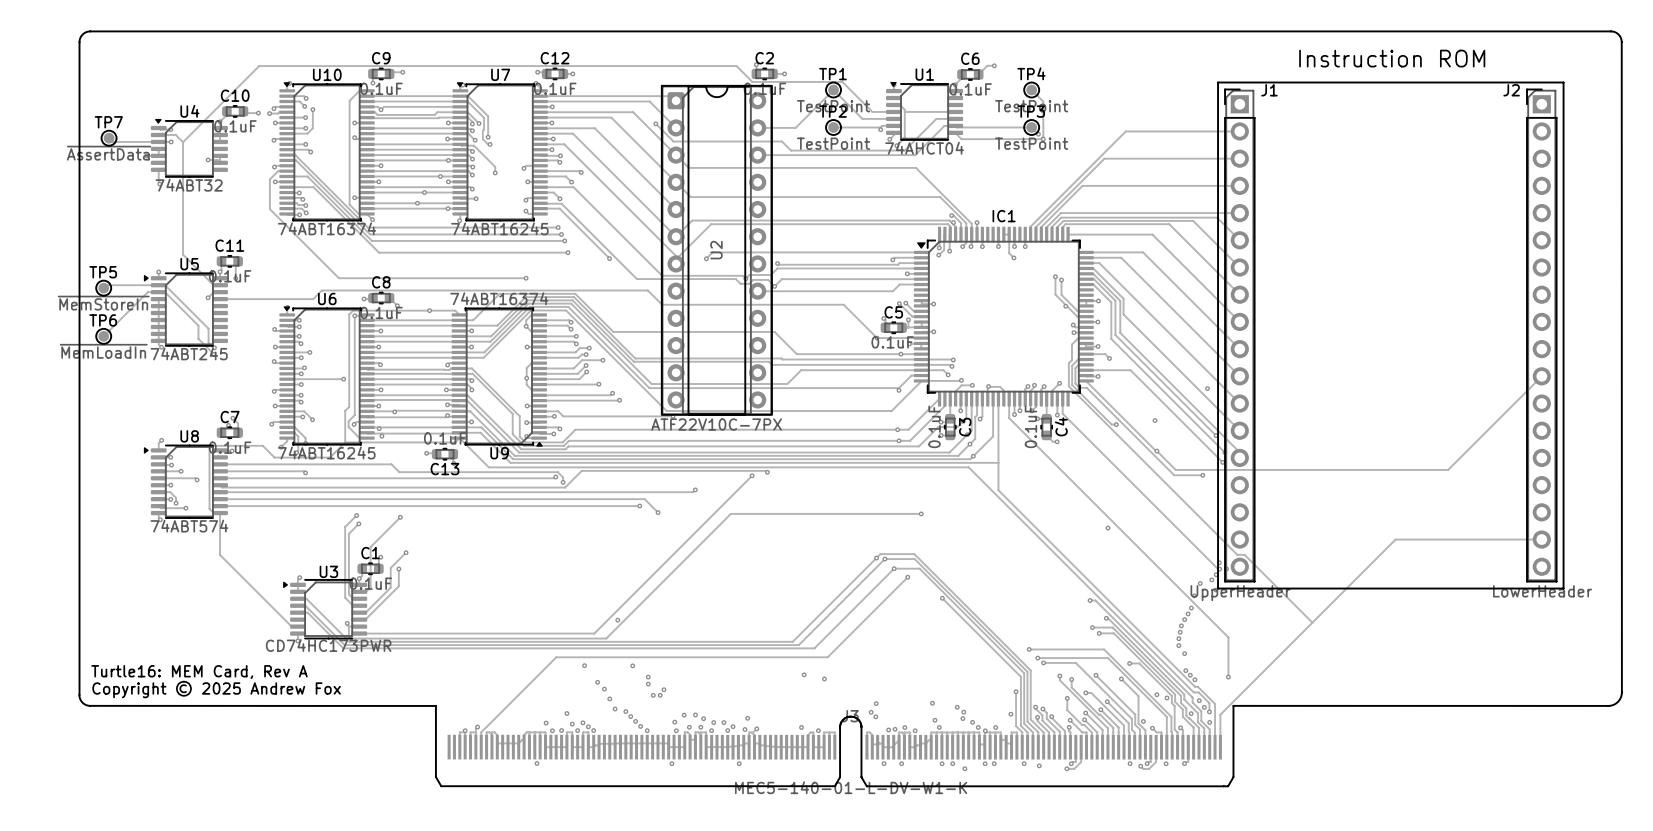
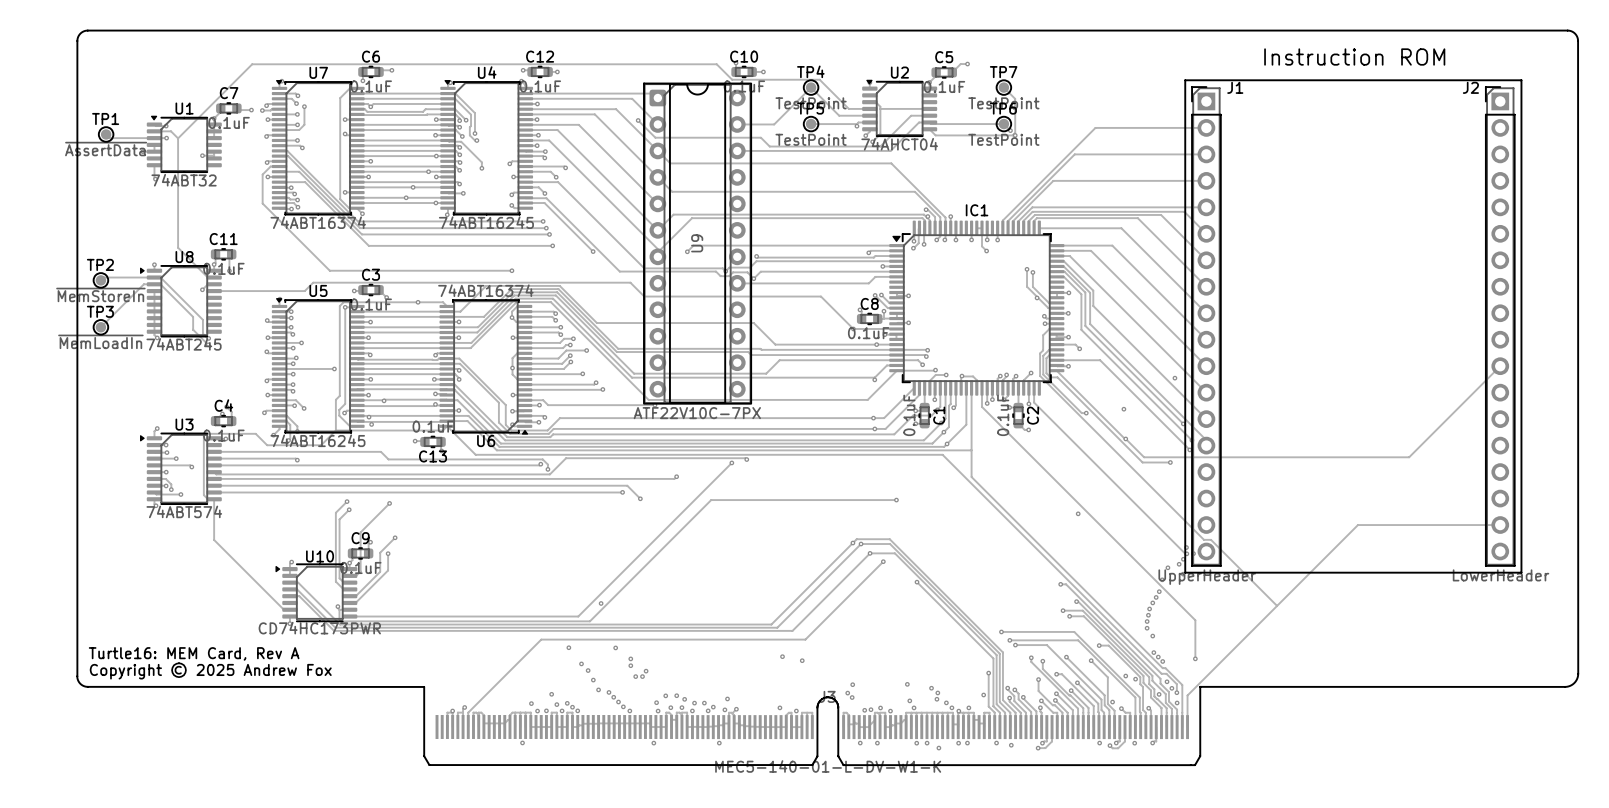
C9 name: C9 (381, 58) -> C6 (370, 56)
C2 name: C2 (764, 58) -> C10 (744, 56)
C6 name: C6 (970, 58) -> C5 (944, 57)
TP4 name: TP4 (1031, 73) -> TP7 (1003, 72)
U10 name: U10 (327, 74) -> U7 (318, 72)
U7 name: U7 (500, 74) -> U4 (487, 72)
TP1 name: TP1 (833, 74) -> TP4 (810, 71)
U1 name: U1 (924, 74) -> U2 (899, 72)
C10 name: C10 (235, 95) -> C7 (229, 93)
U4 name: U4 (189, 111) -> U1 (184, 108)
TP2 name: TP2 (833, 111) -> TP5 (810, 108)
TP3 name: TP3 (1031, 111) -> TP6 (1003, 108)
TP7 name: TP7 (108, 122) -> TP1 (105, 118)
U2 name: U2 (716, 250) -> U9 (697, 243)
U5 name: U5 (189, 264) -> U8 (184, 257)
TP5 name: TP5 (103, 272) -> TP2 (100, 264)
C8 name: C8 (381, 282) -> C3 (370, 274)
U6 name: U6 (327, 298) -> U5 (318, 290)
C5 name: C5 (893, 312) -> C8 (869, 303)
TP6 name: TP6 (103, 320) -> TP3 (100, 311)
C7 name: C7 (230, 417) -> C4 (223, 405)
C4 name: C4 (1061, 426) -> C2 (1033, 415)
C3 name: C3 (965, 427) -> C1 (939, 415)
U8 name: U8 (189, 436) -> U3 (184, 424)
U9 name: U9 (499, 453) -> U6 (486, 441)
C1 name: C1 (370, 553) -> C9 (360, 538)
U3 name: U3 (328, 571) -> U10 (320, 556)

